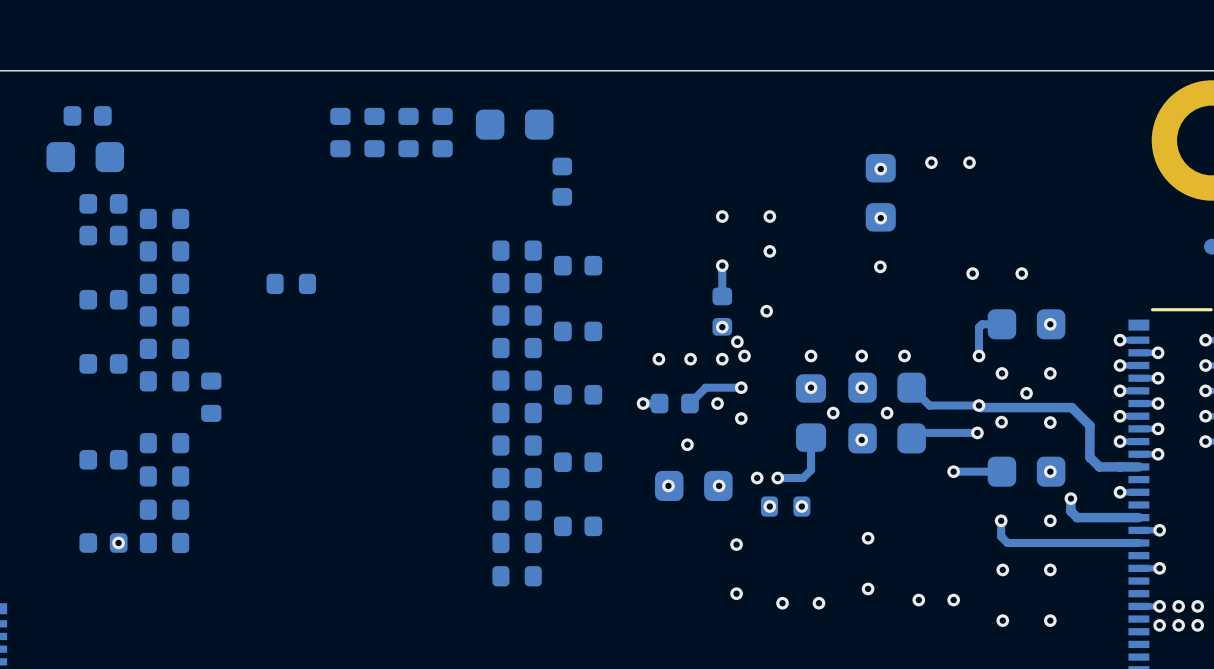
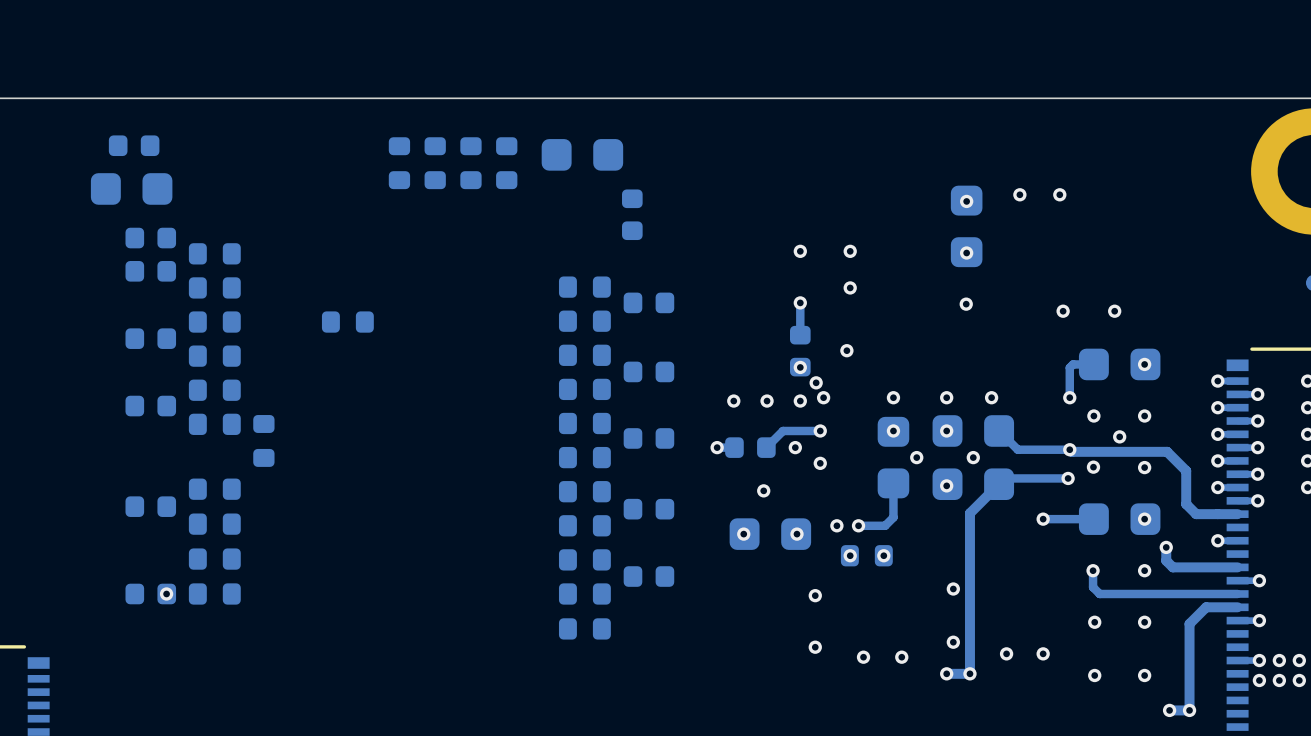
track: none -> (999, 484) (969, 513) (969, 673) (946, 673)
track: none -> (1237, 607) (1206, 607) (1189, 623) (1189, 710) (1169, 710)
via: none -> (946, 673)
via: none -> (969, 673)
via: none -> (1169, 710)
via: none -> (1189, 710)

